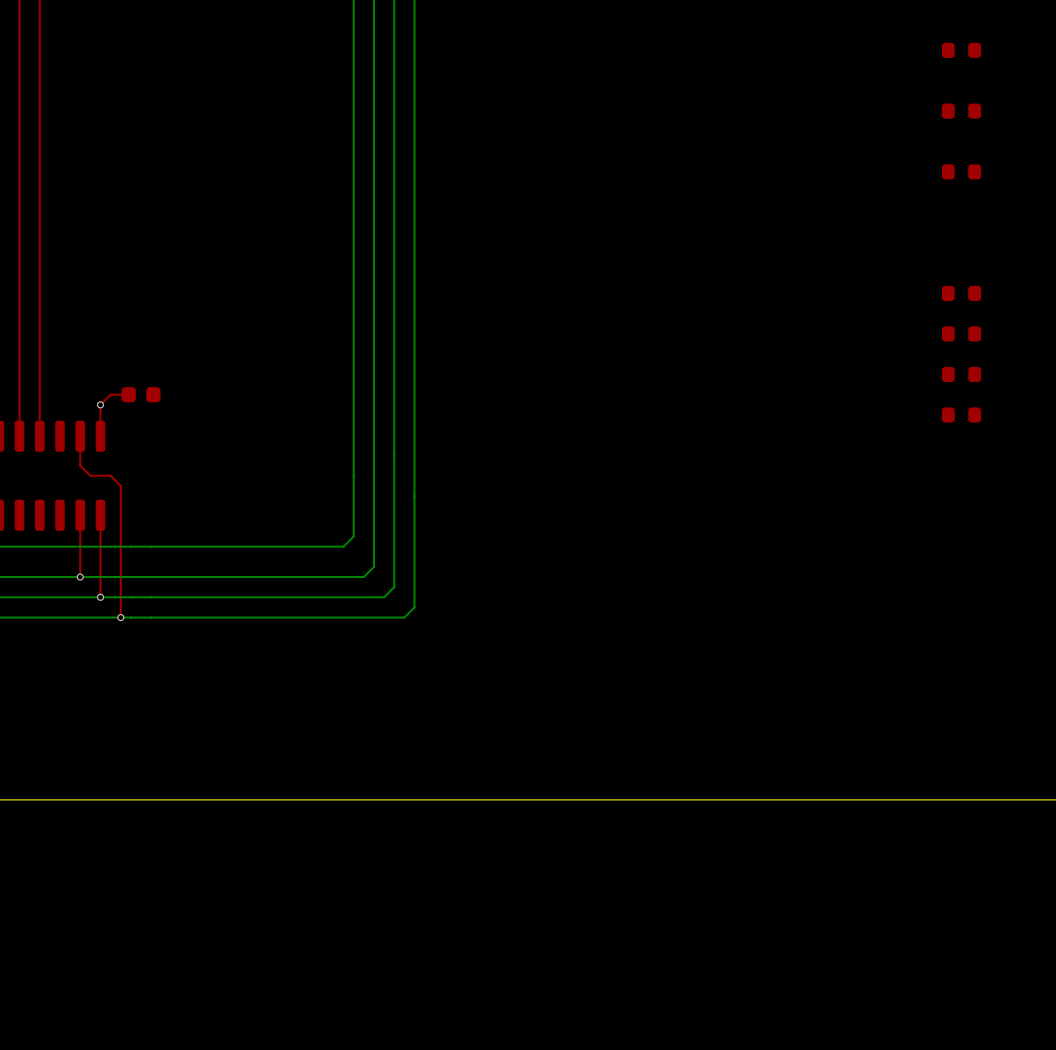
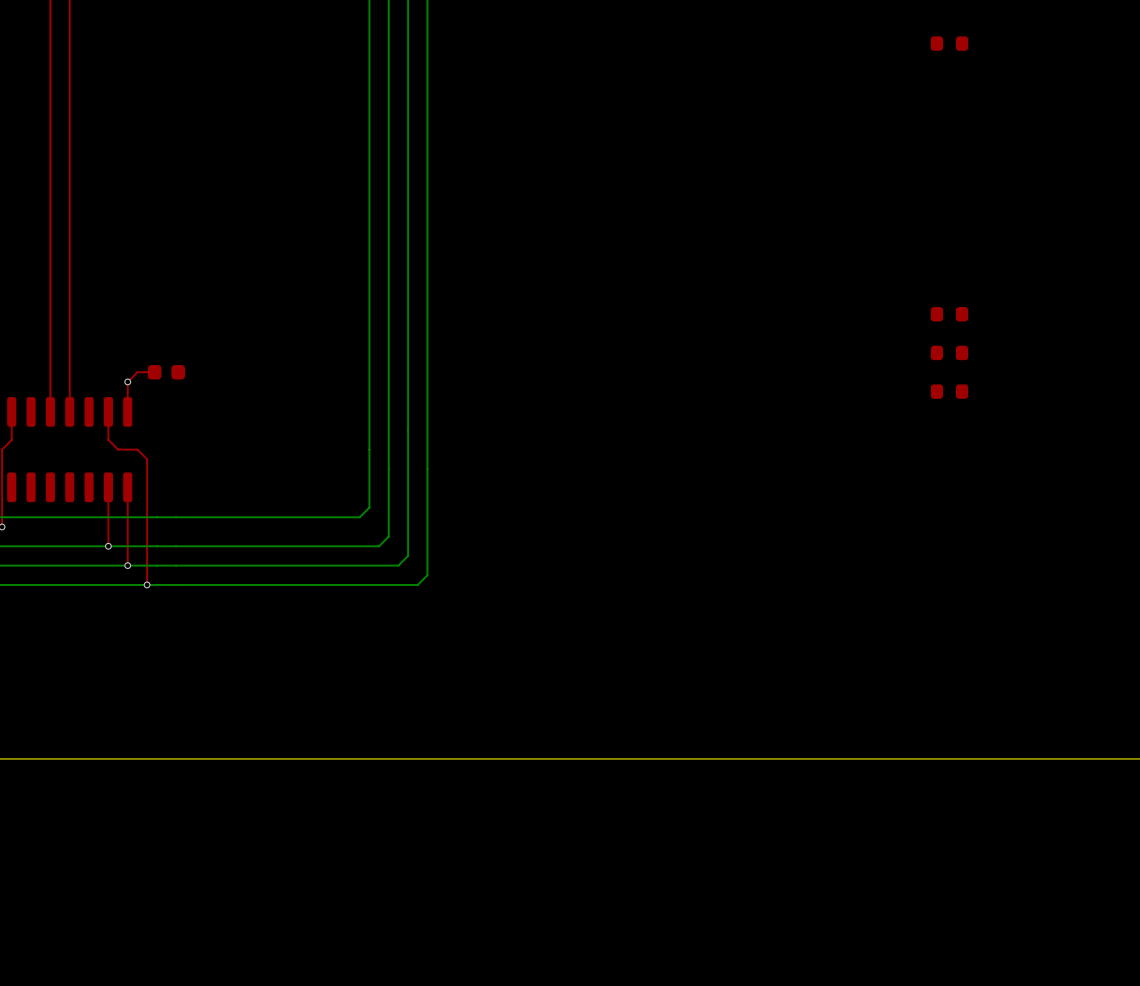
part: (961, 111) -> none
part: (961, 171) -> none
part: (961, 293) -> none

